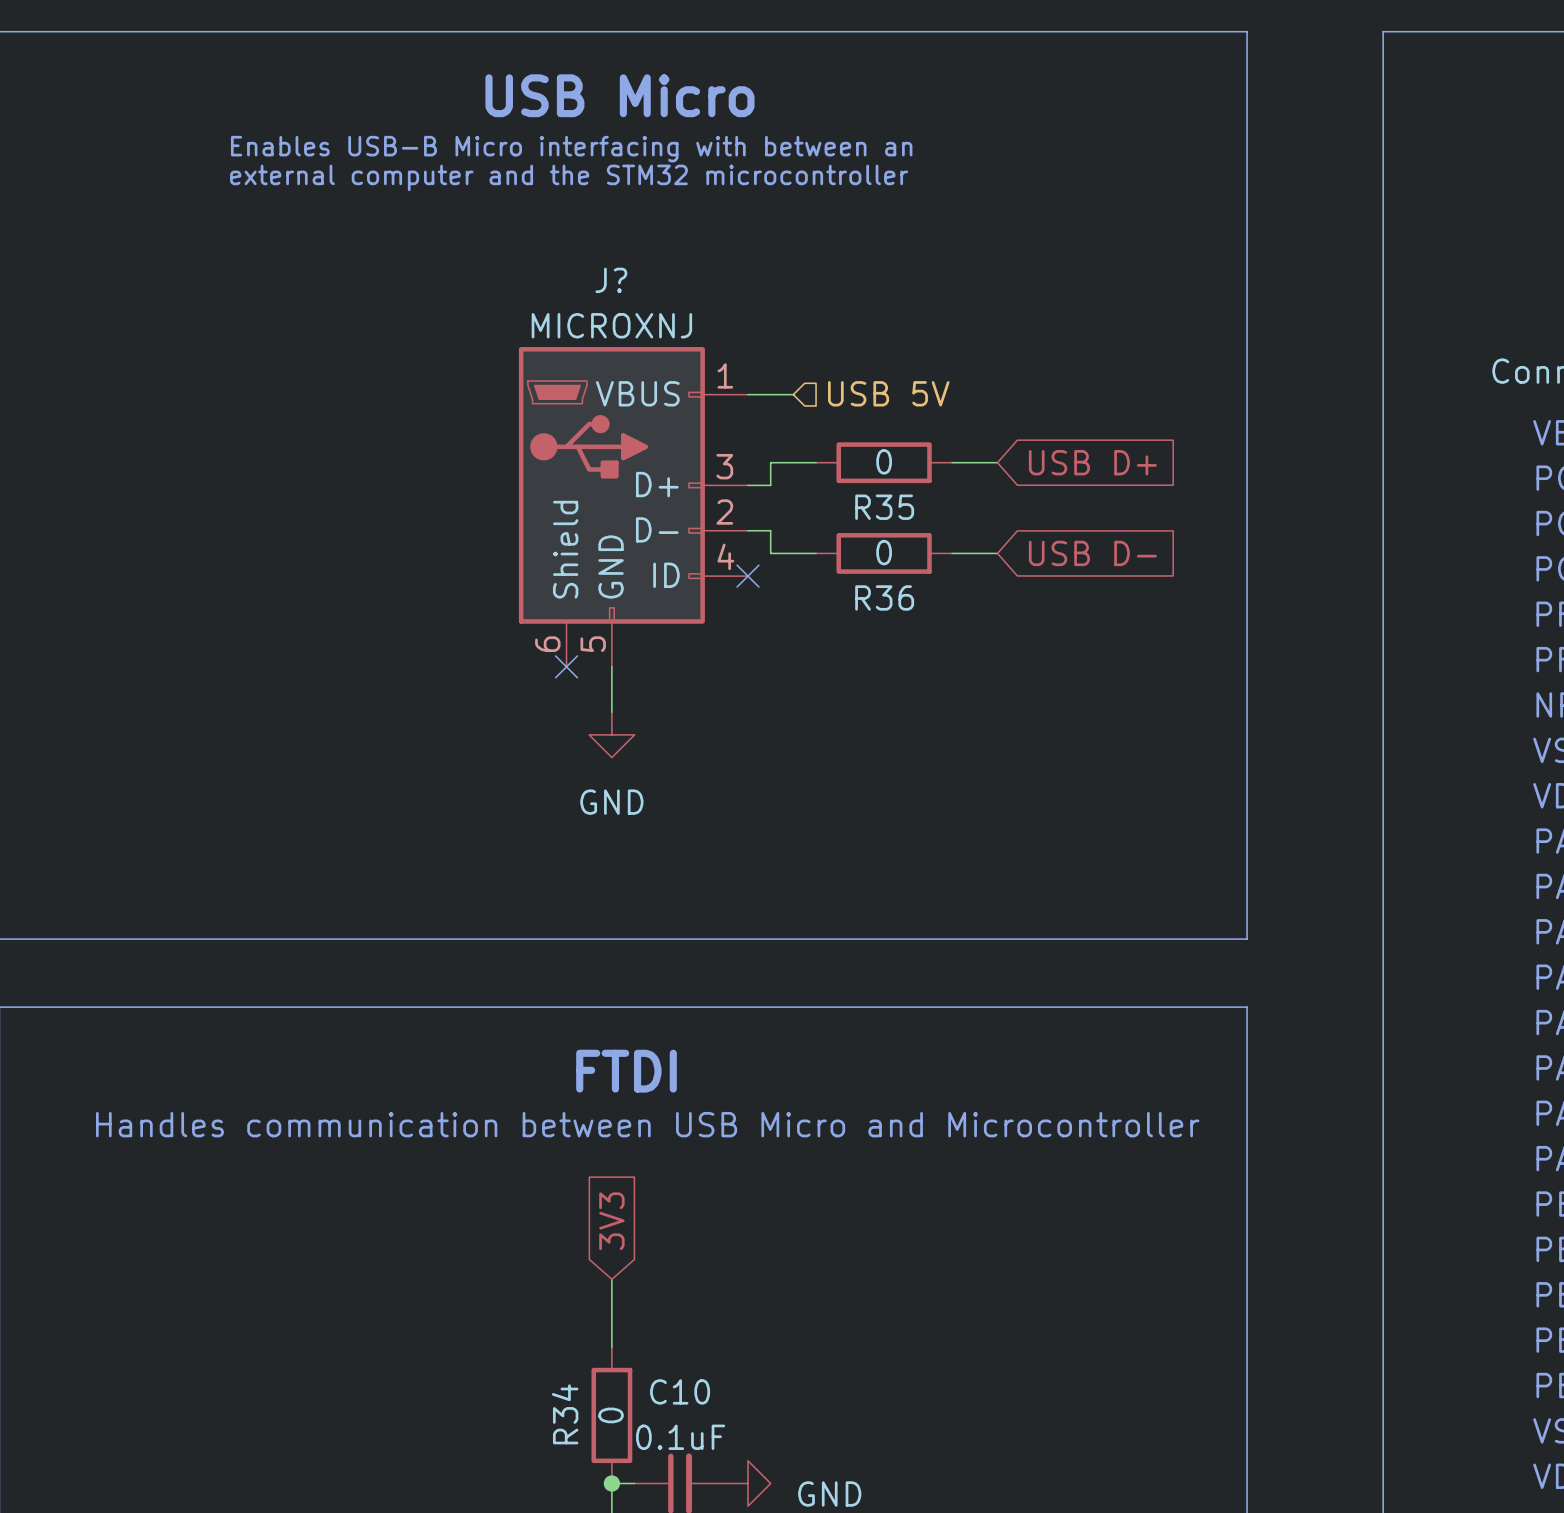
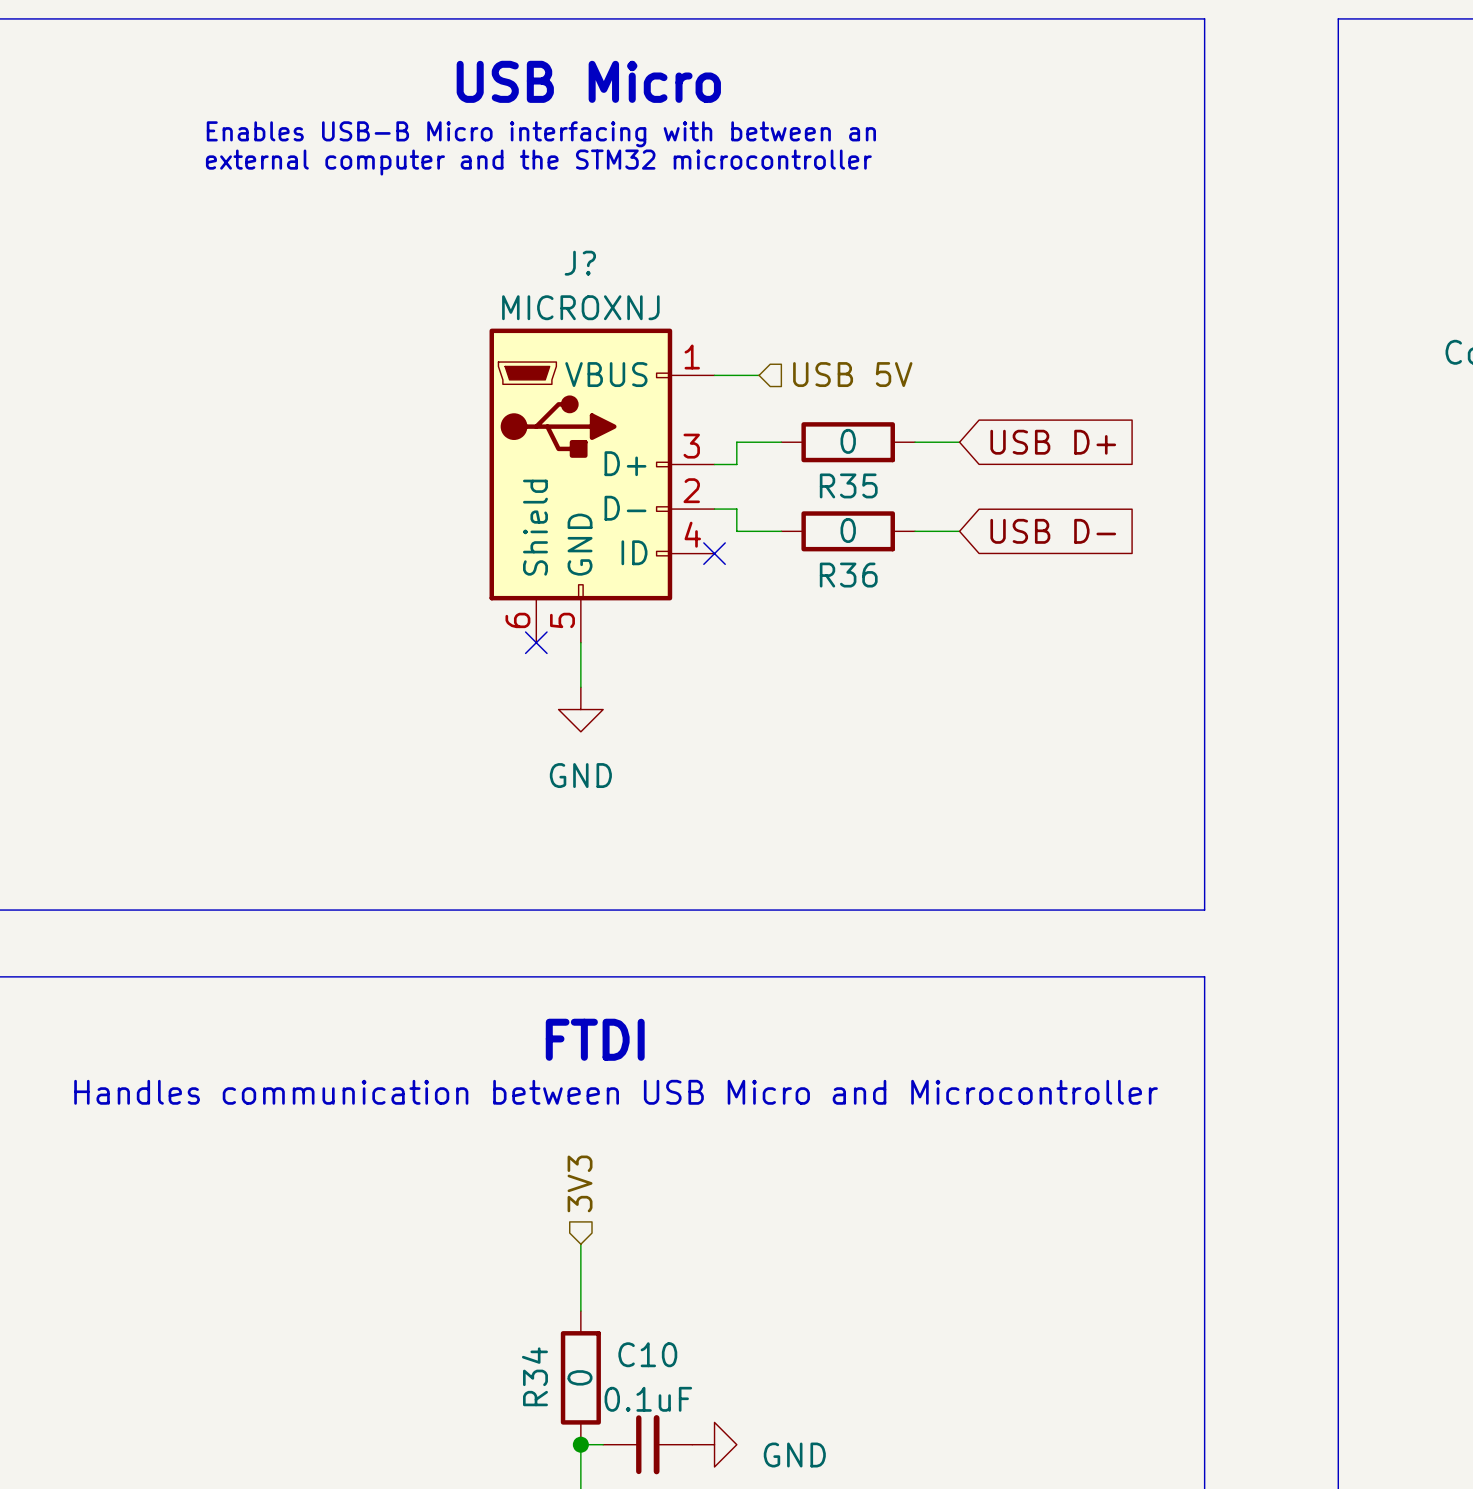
hierarchical label: none -> 3V3 (580, 1183)
global label: 3V3 (611, 1221) -> none

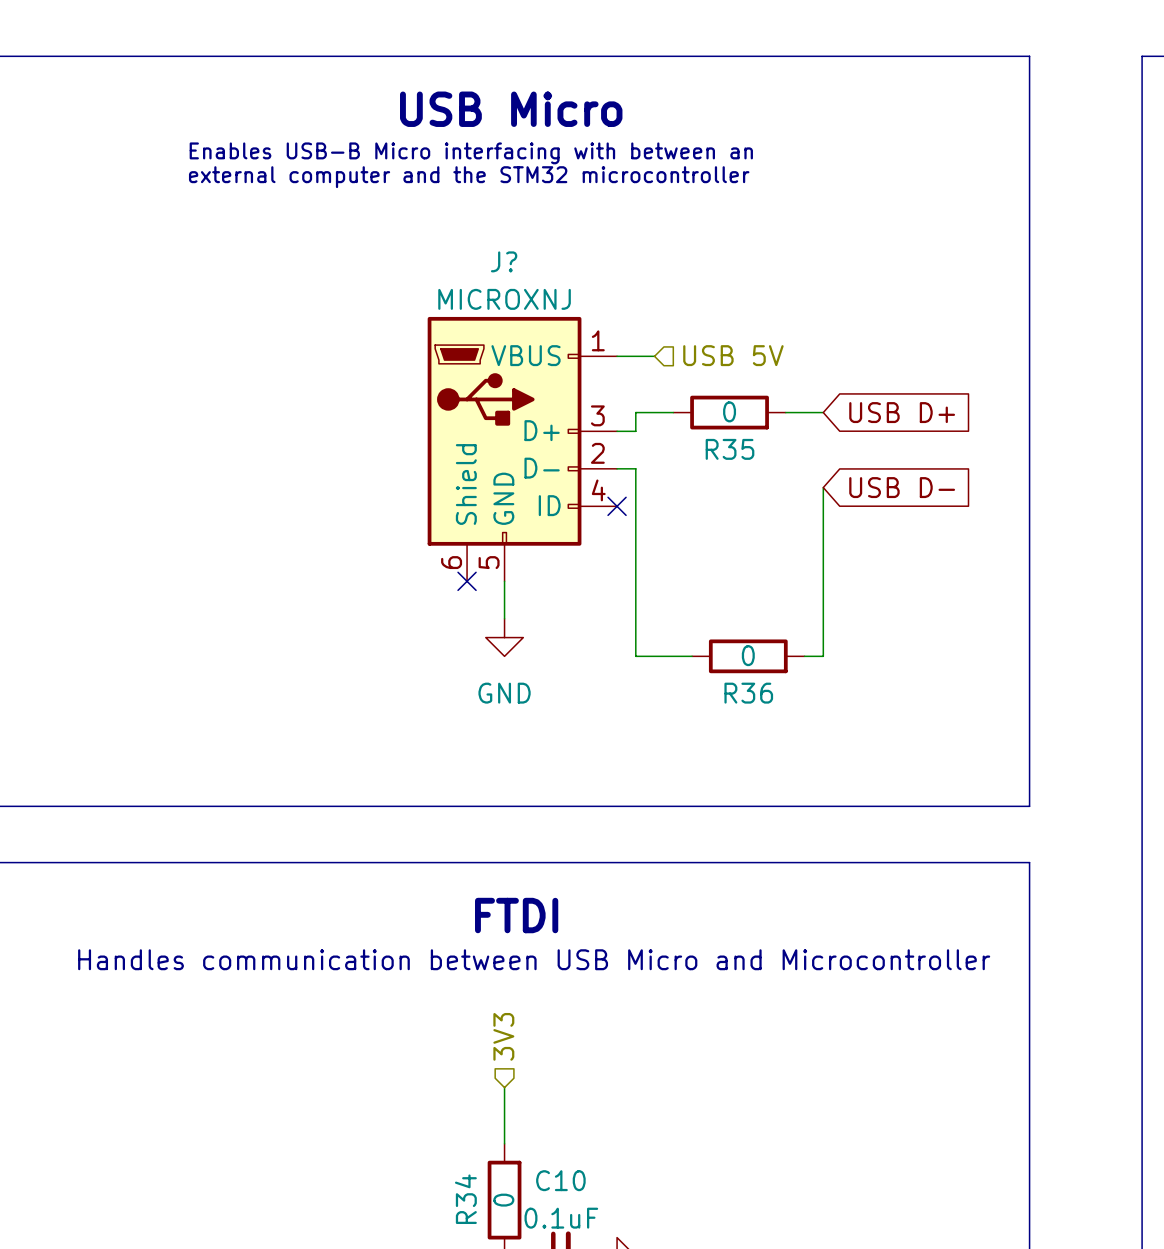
wire: (736, 531) (781, 531) -> (635, 487) (635, 656) (692, 656)
R36 position: (848, 531) -> (748, 656)
wire: (915, 531) (959, 531) -> (804, 656) (823, 656) (823, 487)

